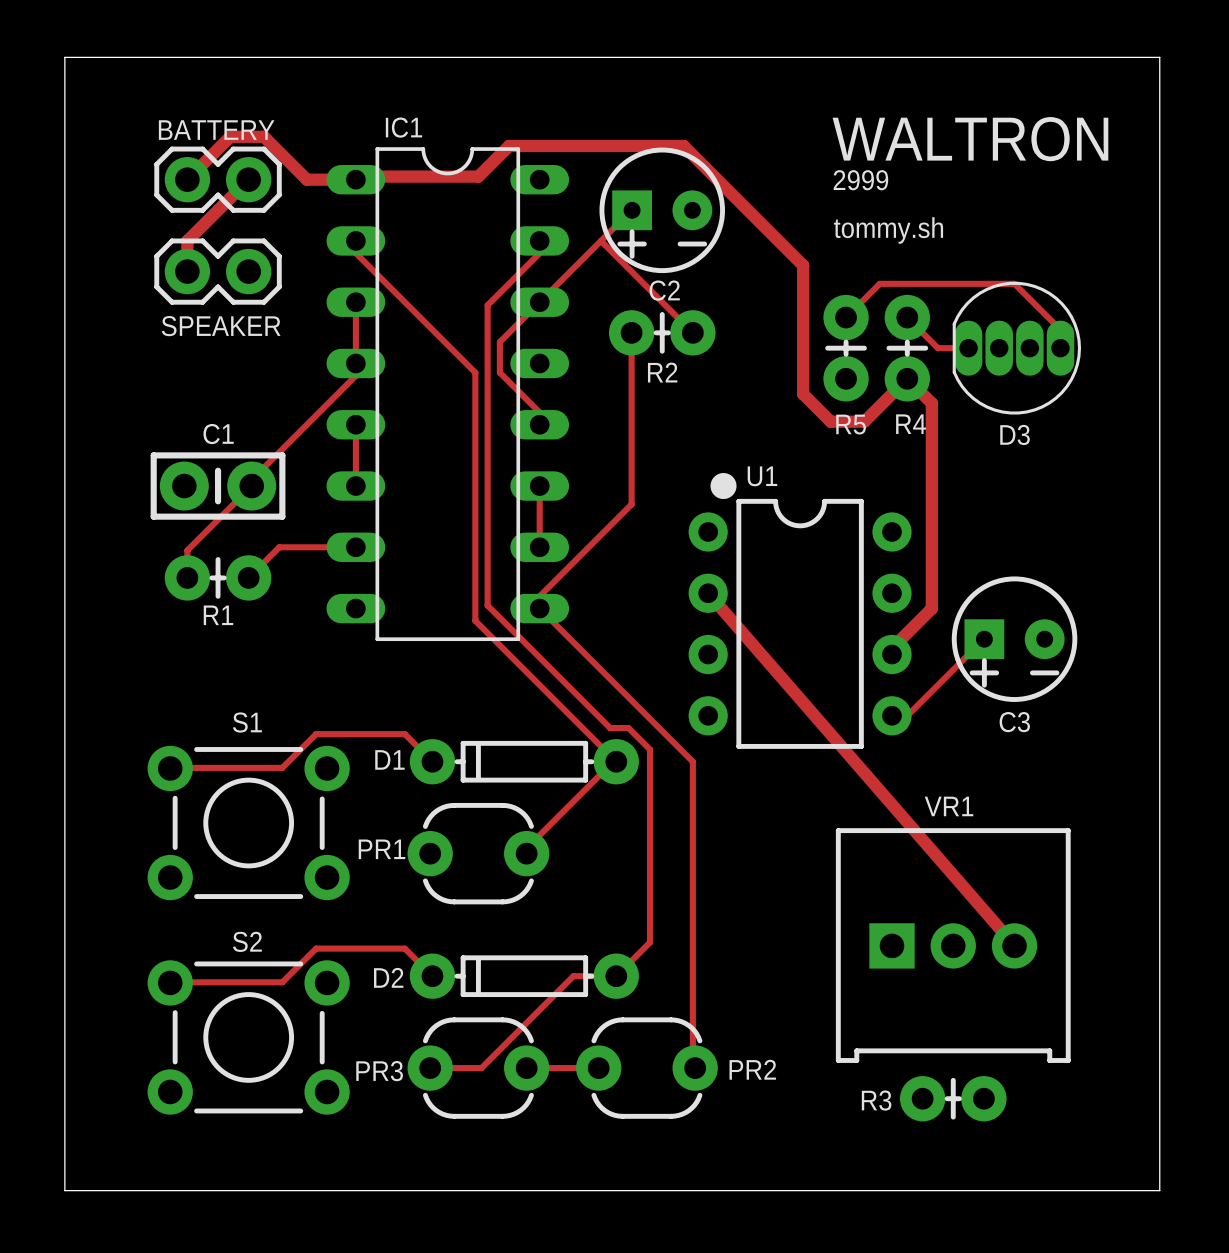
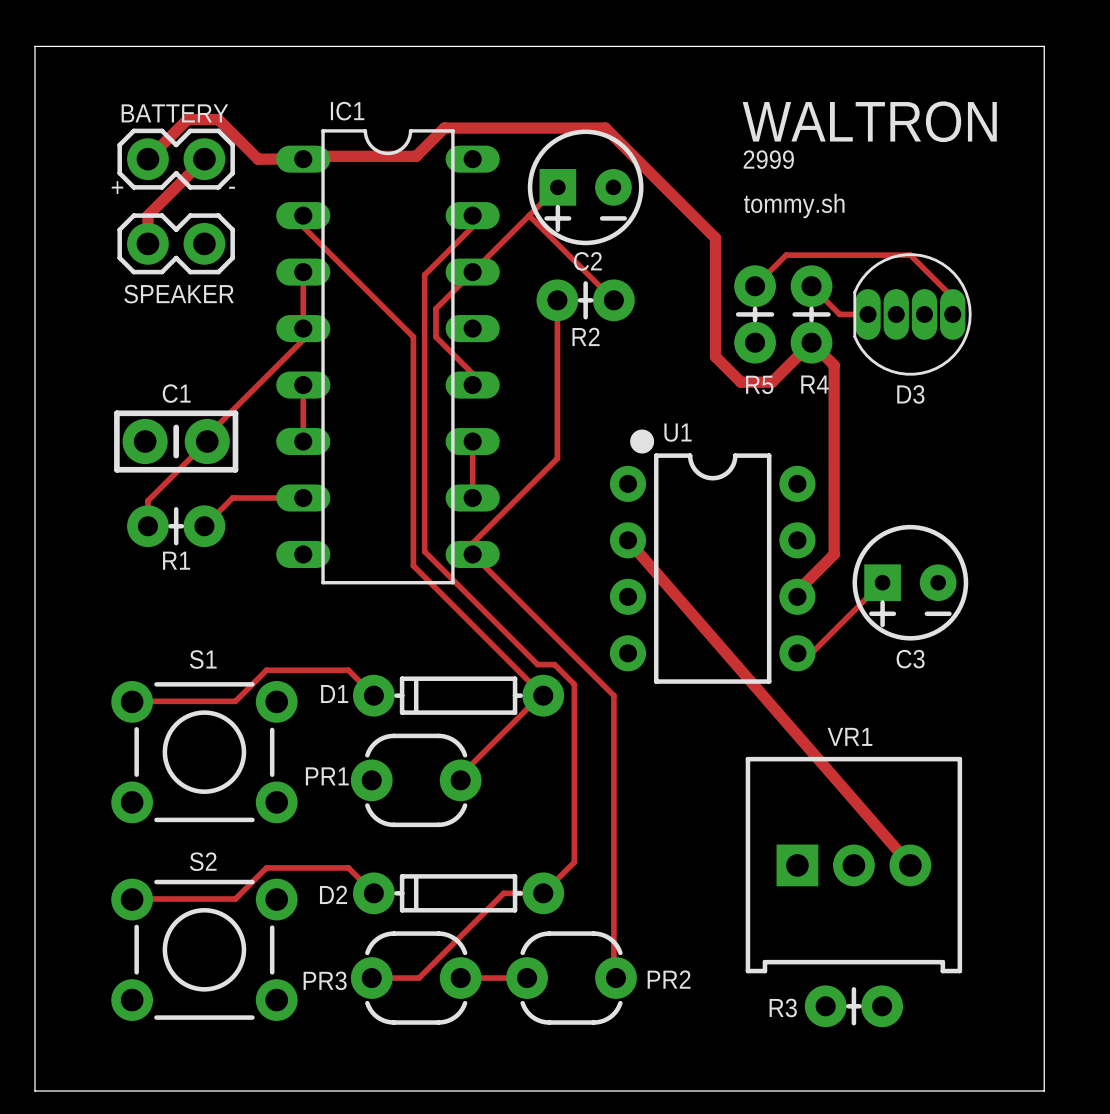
text: none -> + (117, 187)
text: none -> - (232, 187)

